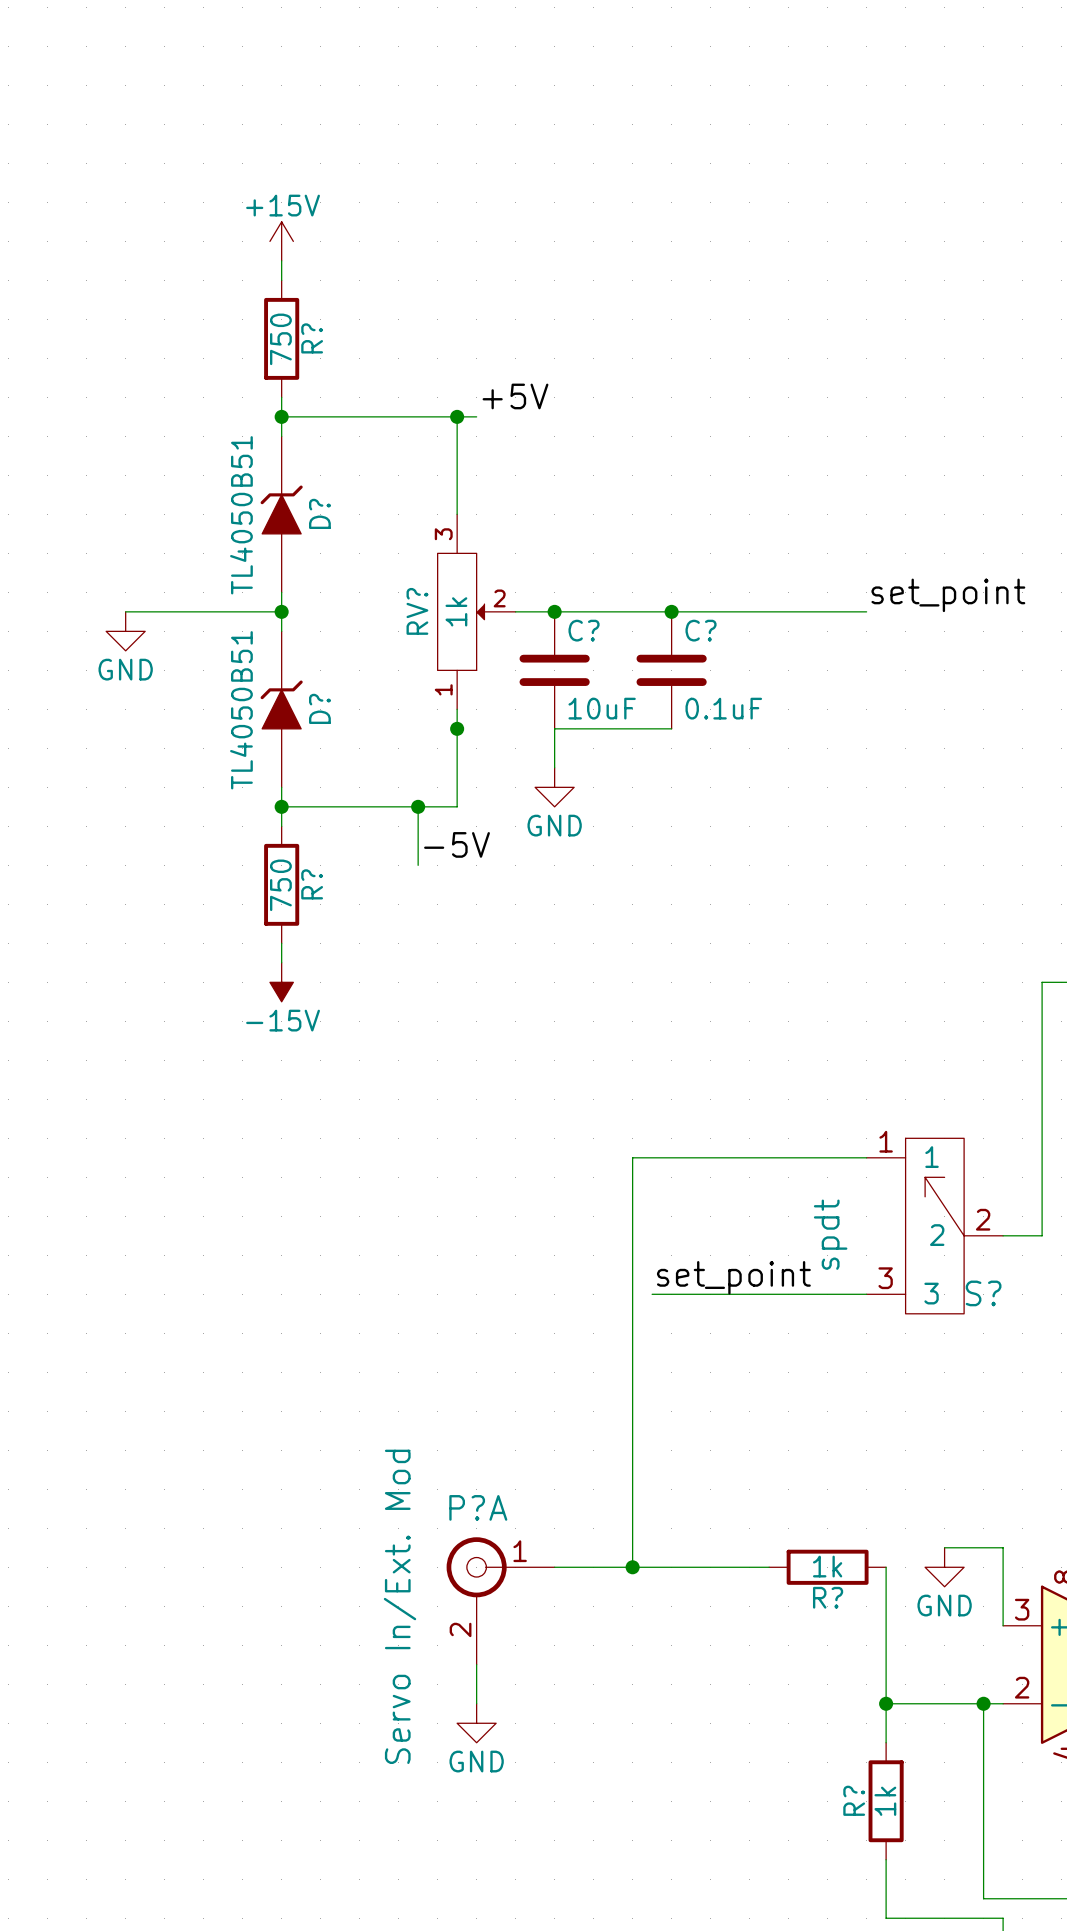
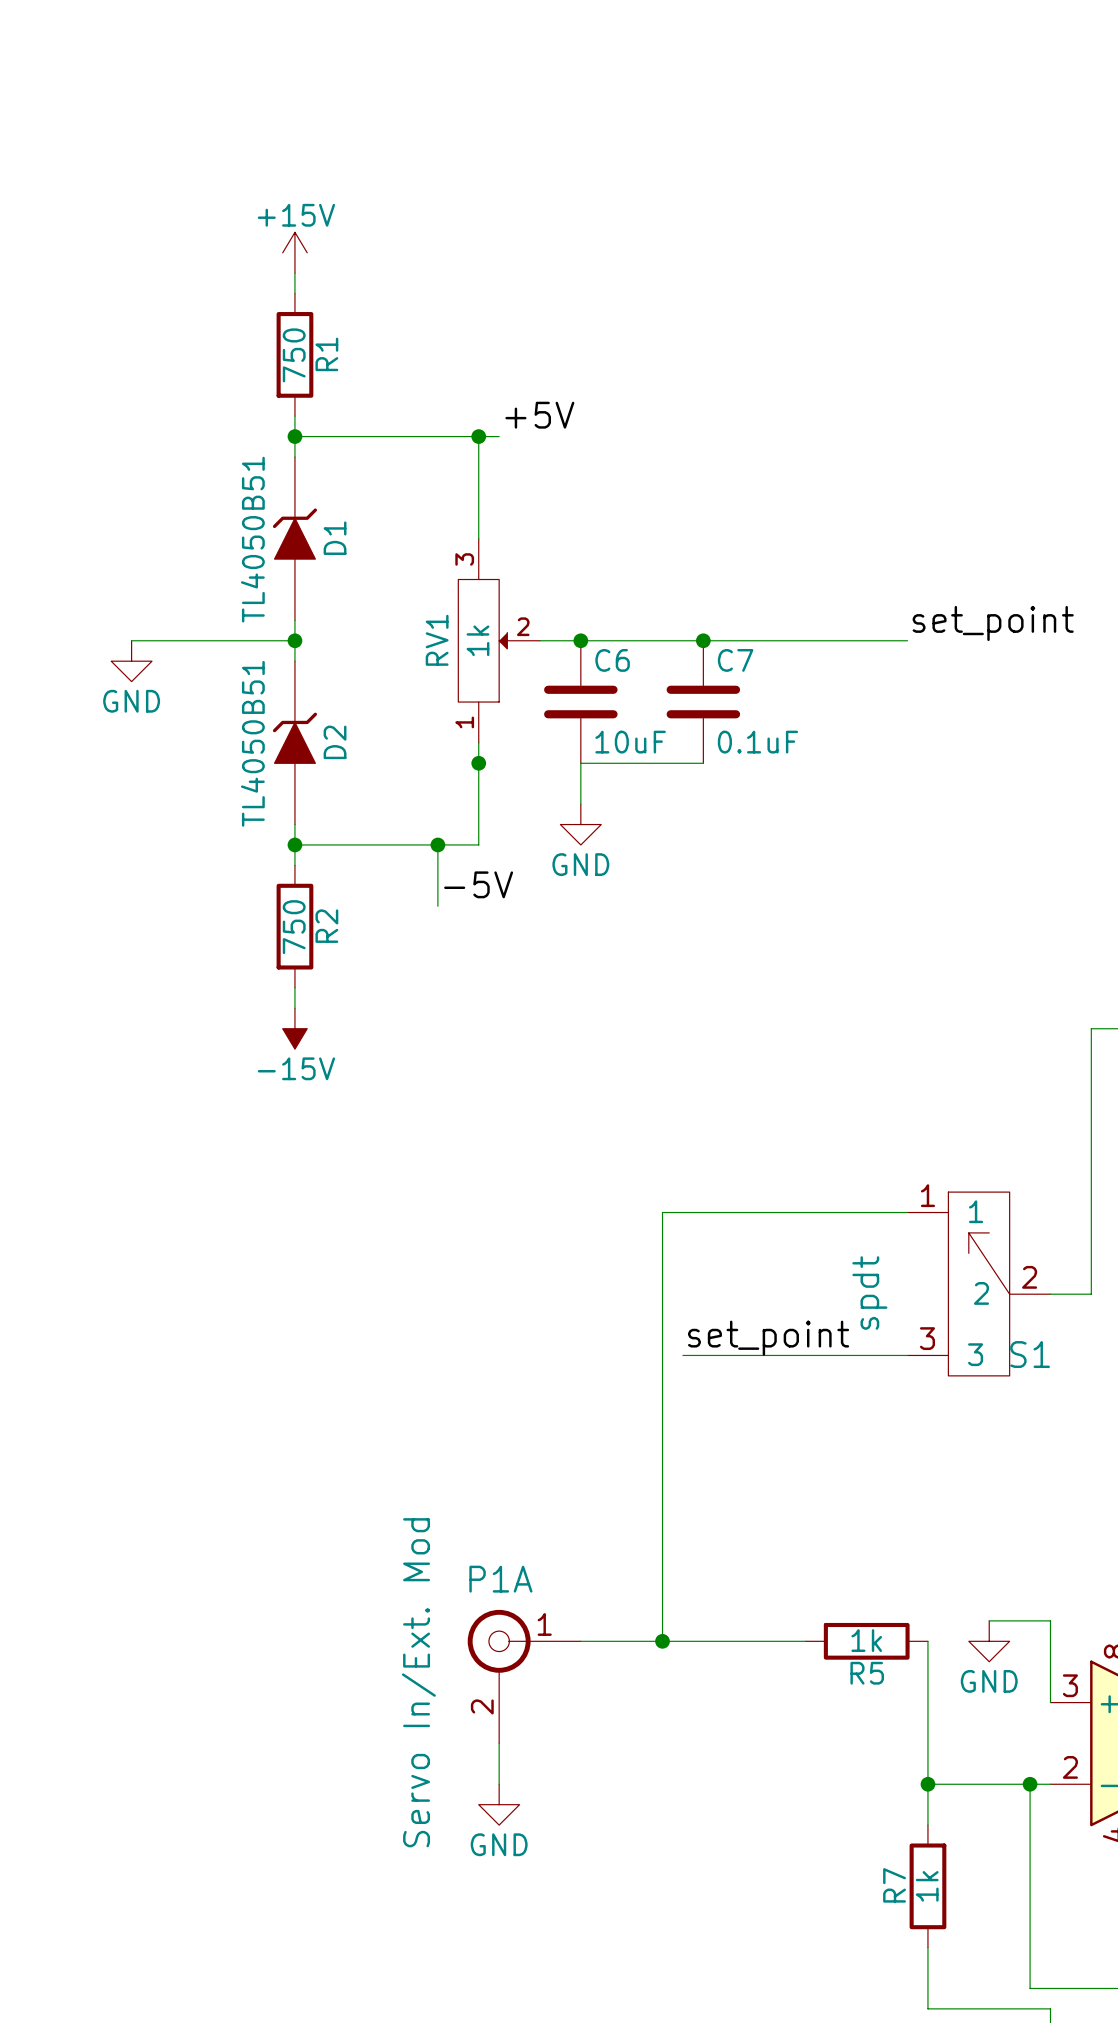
R? name: R? (312, 338) -> R1 (326, 354)
D? name: D? (319, 513) -> D1 (335, 538)
RV? name: RV? (417, 611) -> RV1 (437, 640)
C? name: C? (584, 630) -> C6 (612, 660)
C? name: C? (701, 630) -> C7 (735, 660)
D? name: D? (319, 708) -> D2 (335, 742)
R? name: R? (312, 884) -> R2 (326, 926)
S? name: S? (983, 1293) -> S1 (1030, 1354)
P?A name: P?A (478, 1507) -> P1A (500, 1579)
R? name: R? (828, 1597) -> R5 (867, 1673)
R? name: R? (854, 1800) -> R7 (894, 1885)

